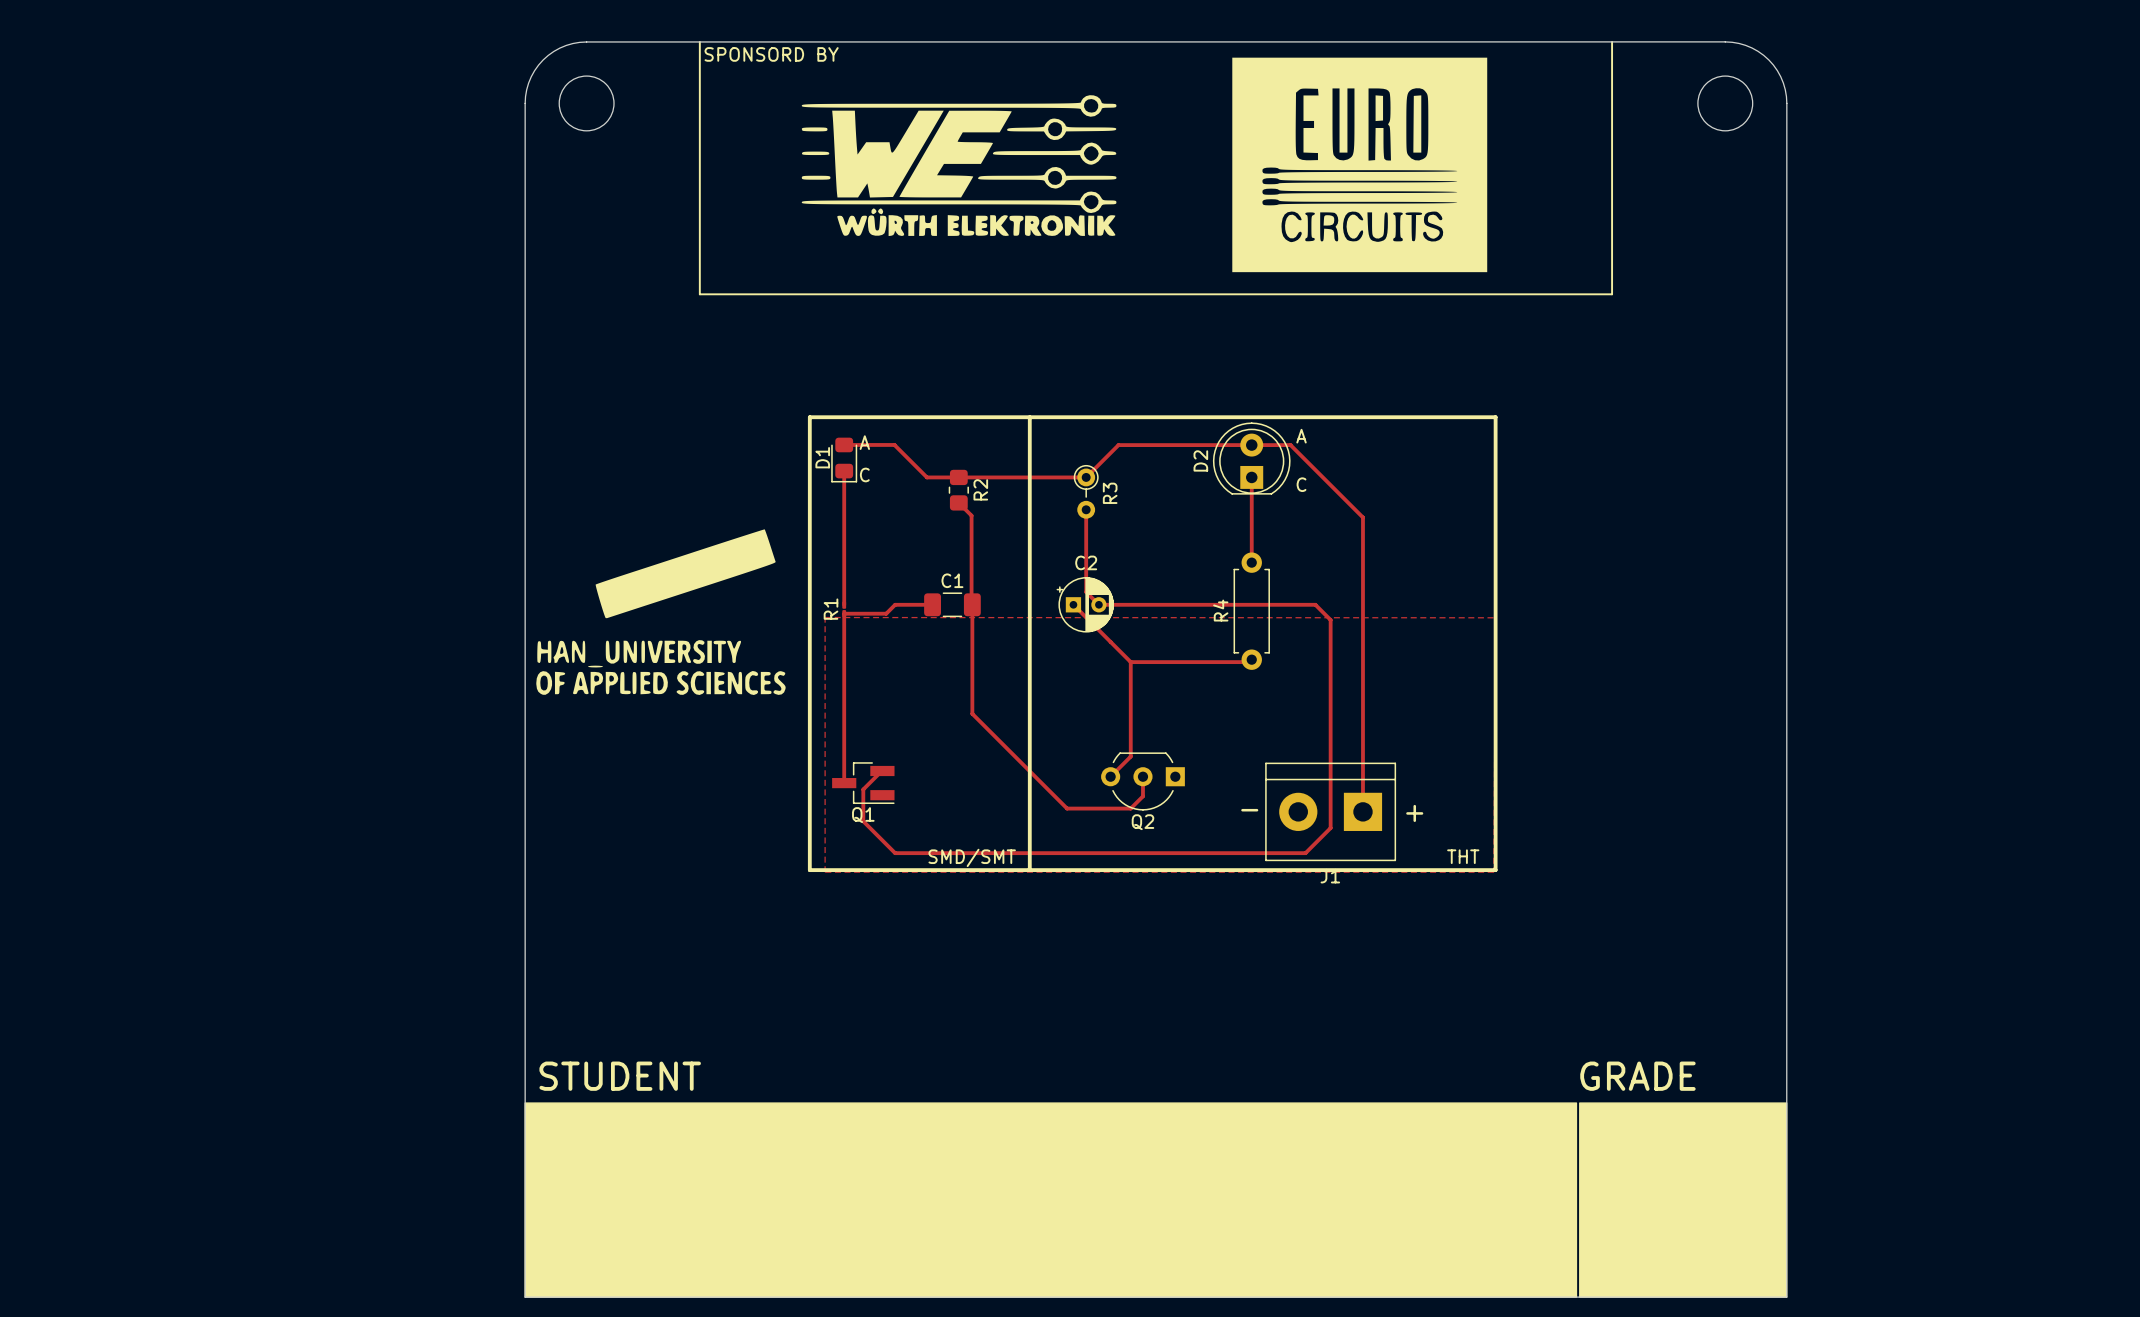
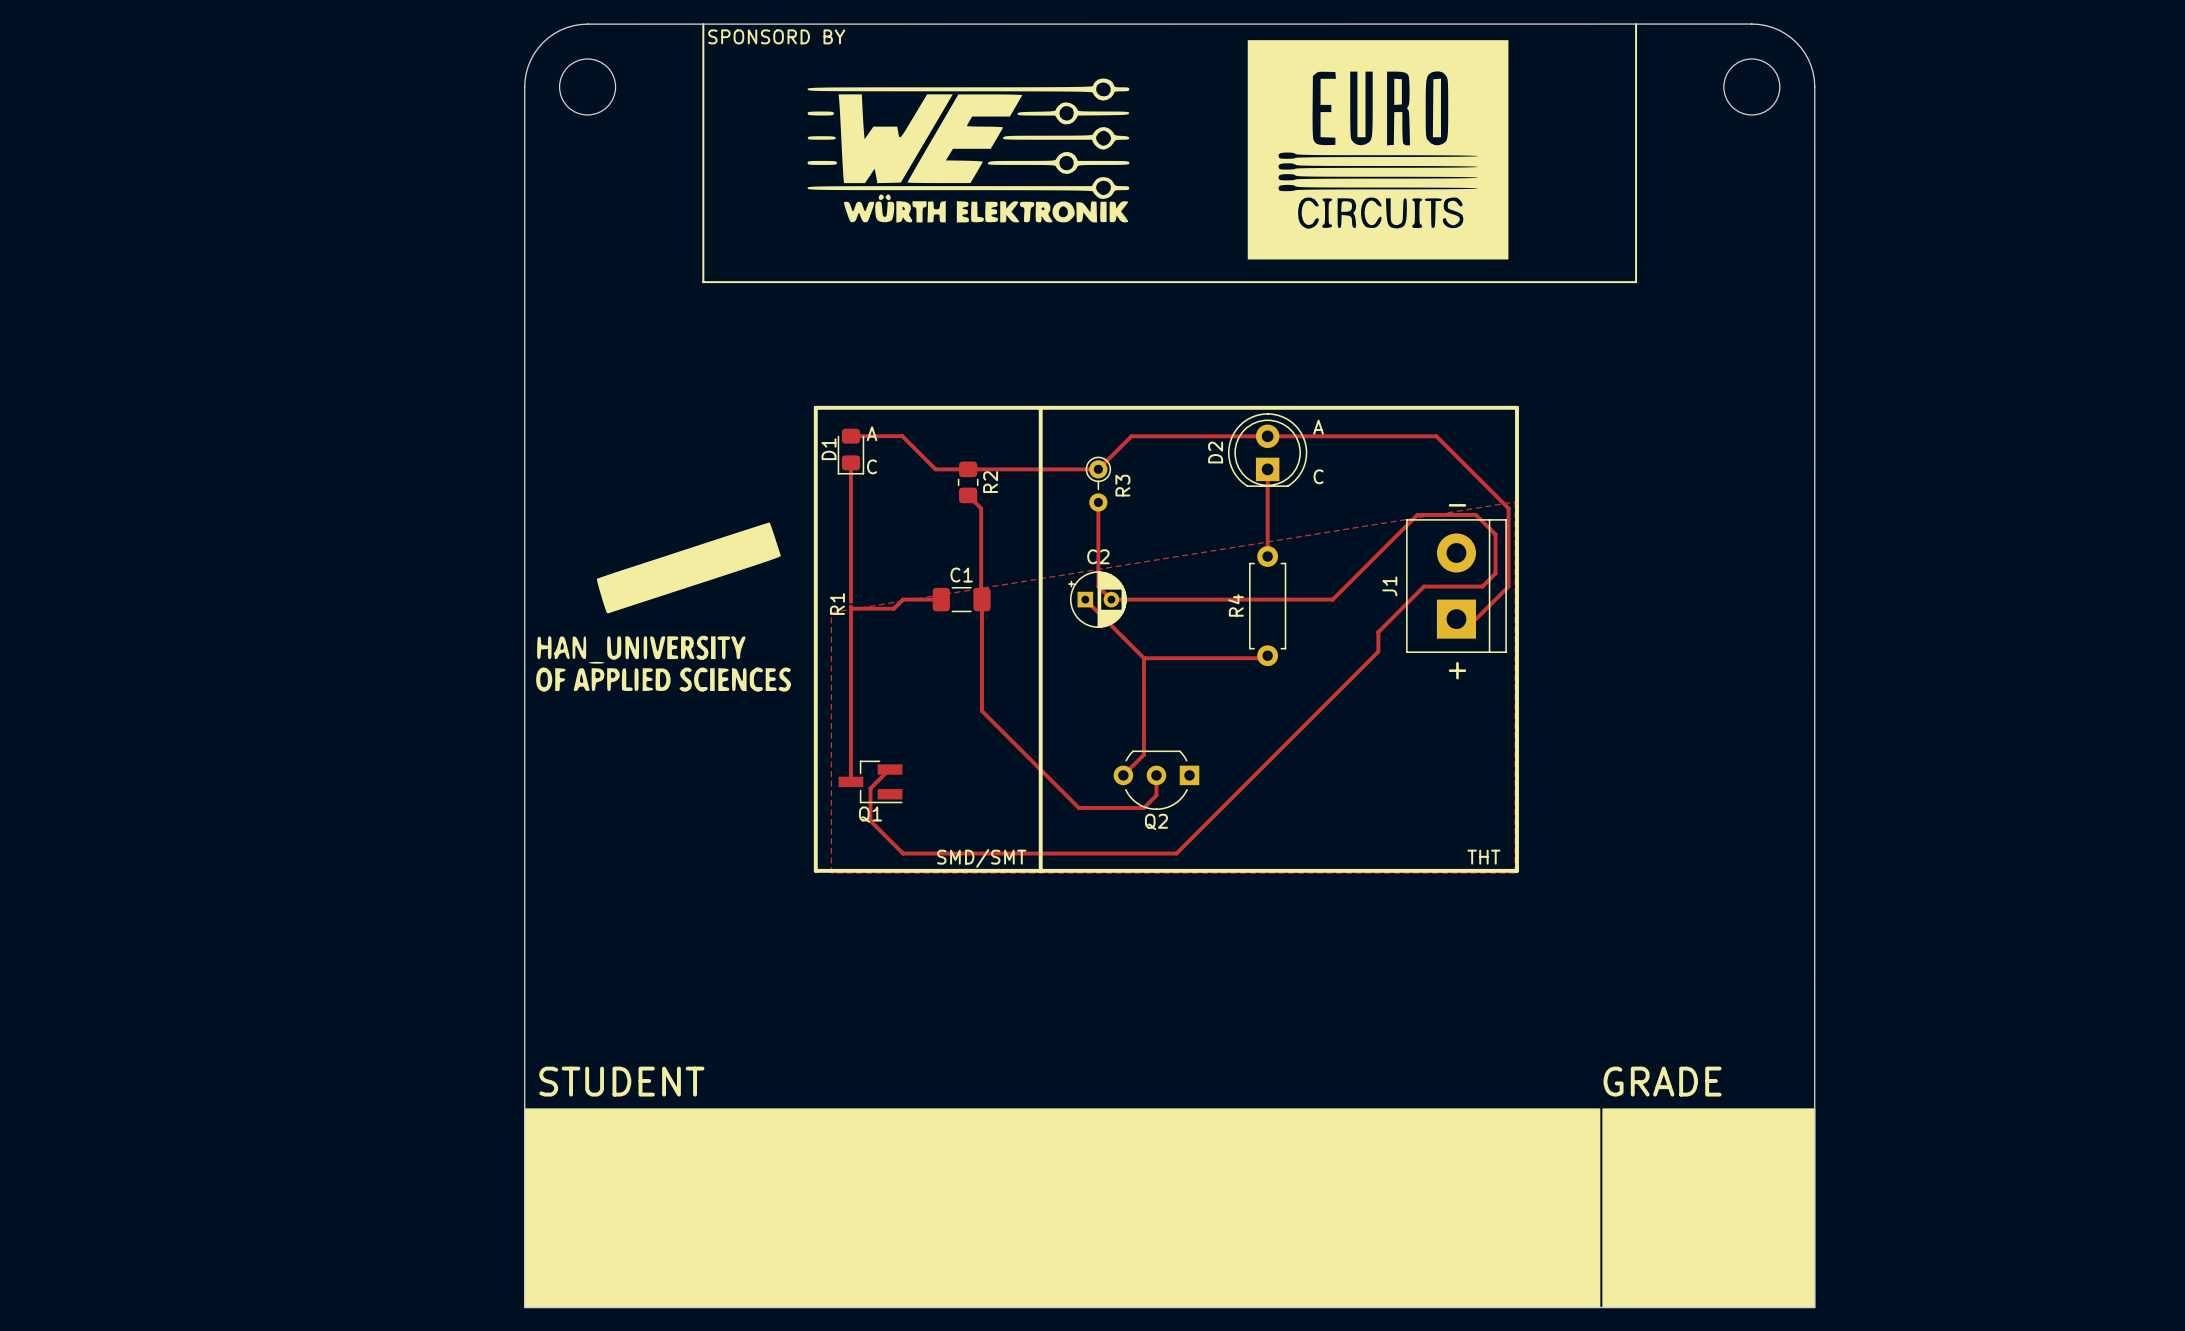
track: (1290, 445) (1362, 517) (1362, 811) -> (1307, 436) (1436, 436) (1508, 508) (1508, 586) (1476, 619) (1456, 619)
text: none -> - (1457, 505)
track: (1315, 604) (1330, 620) (1330, 828) (1305, 853) (1162, 853) -> (1332, 599) (1417, 514) (1476, 514) (1495, 534) (1495, 573) (1482, 586) (1423, 586) (1378, 632) (1378, 651) (1176, 853)
zone outline: (825, 617) (1495, 617) (1493, 872) -> (831, 612) (1515, 501) (1515, 873)
text: - (1249, 810) -> none
J1 rotation: 0° (1330, 811) -> 90° clockwise (1456, 586)
J1 position: (1330, 811) -> (1456, 586)
text position: + (1414, 813) -> + (1457, 670)

